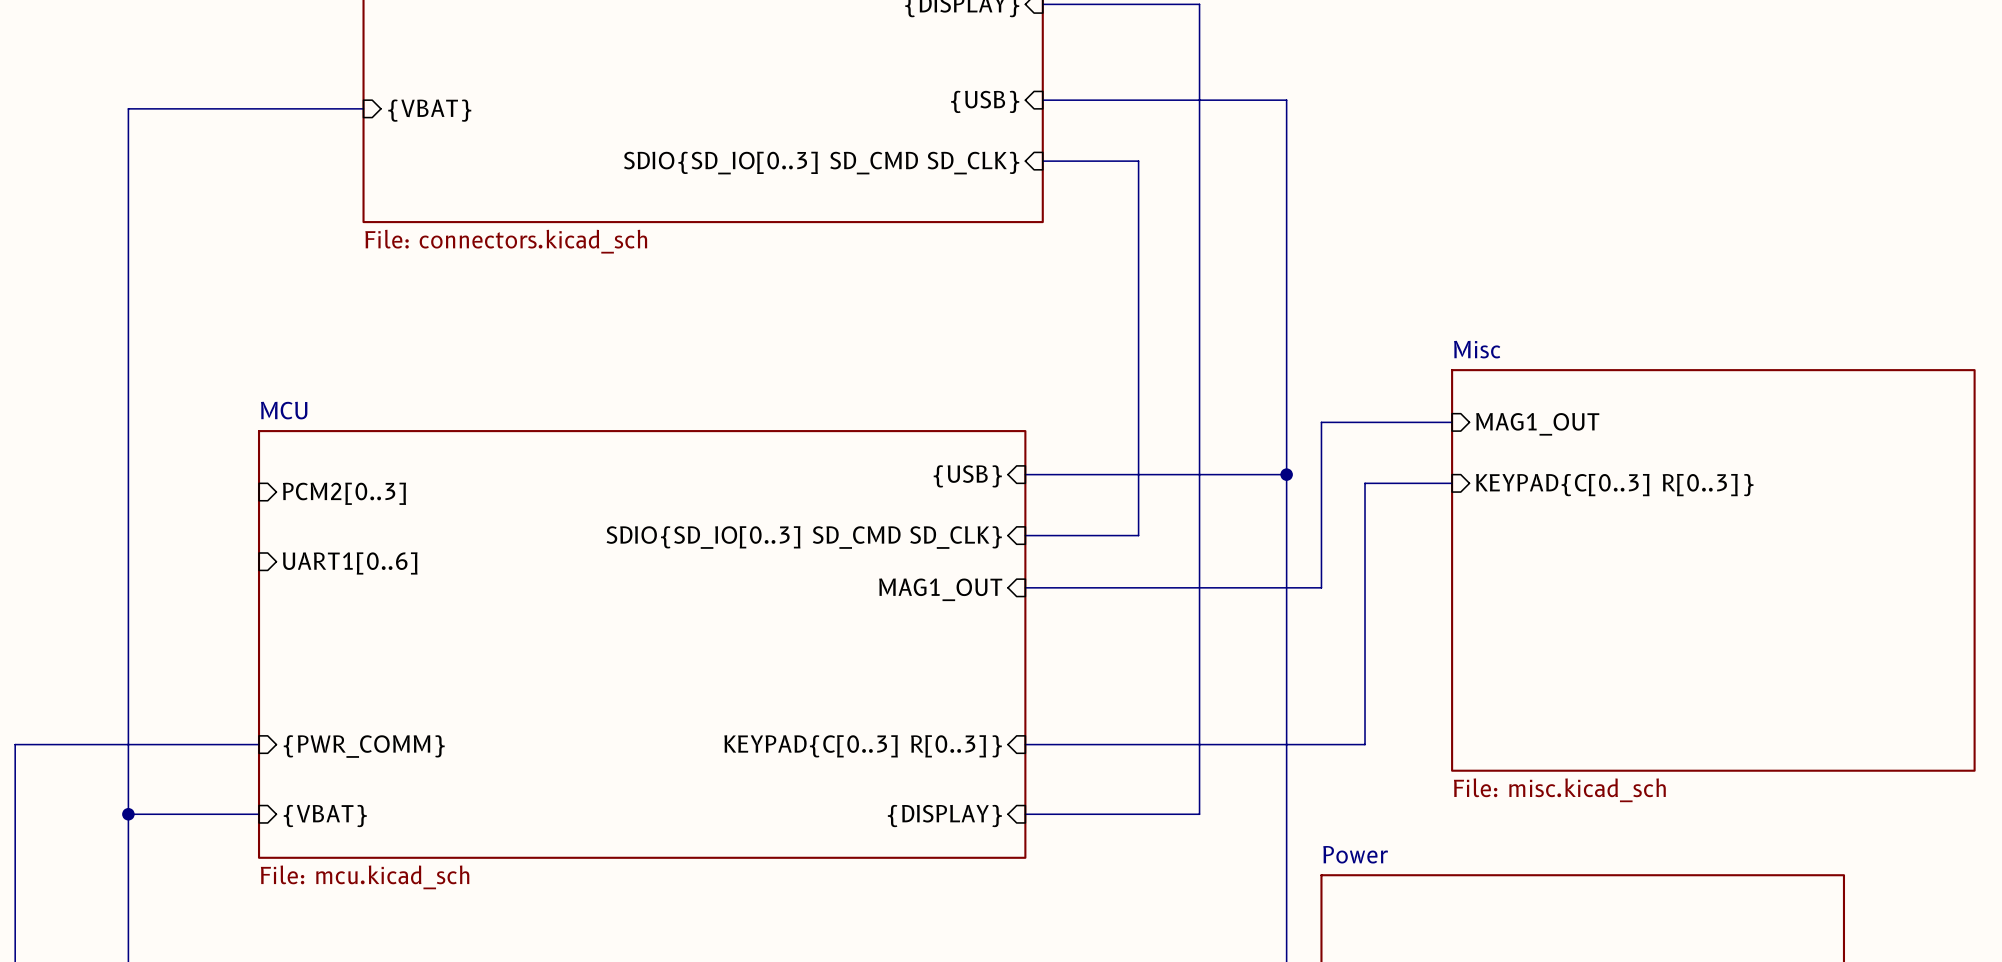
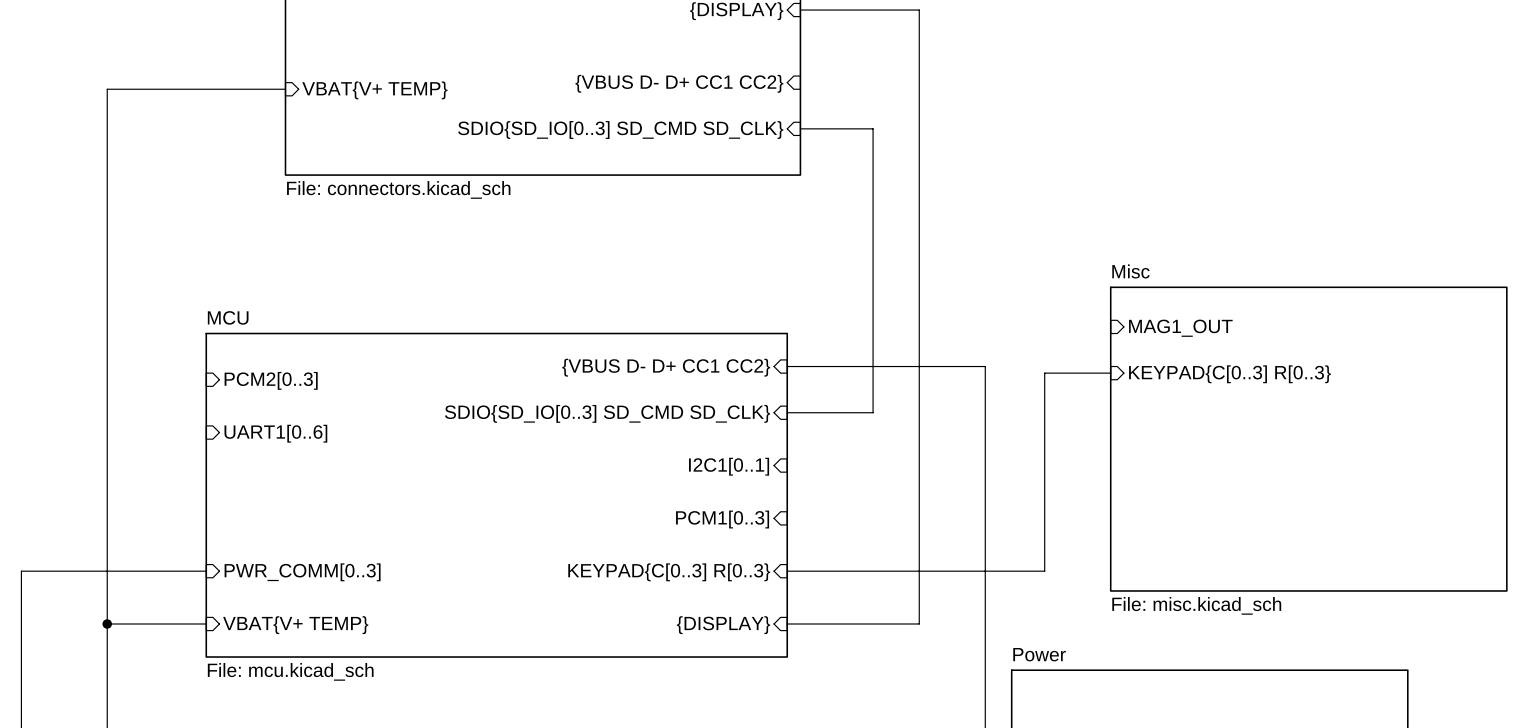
bus: (1042, 100) (1286, 100) (1286, 474) -> none
sheet pin: {USB} (985, 101) -> {VBUS D- D+ CC1 CC2} (679, 83)
sheet pin: {VBAT} (429, 110) -> VBAT{V+ TEMP} (374, 90)
wire: (1452, 422) (1321, 422) (1321, 587) (1025, 587) -> none
junction: (1286, 474) -> none
sheet pin: {USB} (967, 476) -> {VBUS D- D+ CC1 CC2} (666, 367)
sheet pin: KEYPAD{C[0..3] R[0..3]} (1614, 485) -> KEYPAD{C[0..3] R[0..3} (1229, 374)
sheet pin: MAG1_OUT (940, 589) -> none
sheet pin: none -> I2C1[0..1] (729, 466)
sheet pin: none -> PCM1[0..3] (722, 519)
sheet pin: {PWR_COMM} (364, 746) -> PWR_COMM[0..3] (302, 572)
sheet pin: KEYPAD{C[0..3] R[0..3]} (863, 746) -> KEYPAD{C[0..3] R[0..3} (669, 572)
sheet pin: {VBAT} (325, 816) -> VBAT{V+ TEMP} (295, 625)

